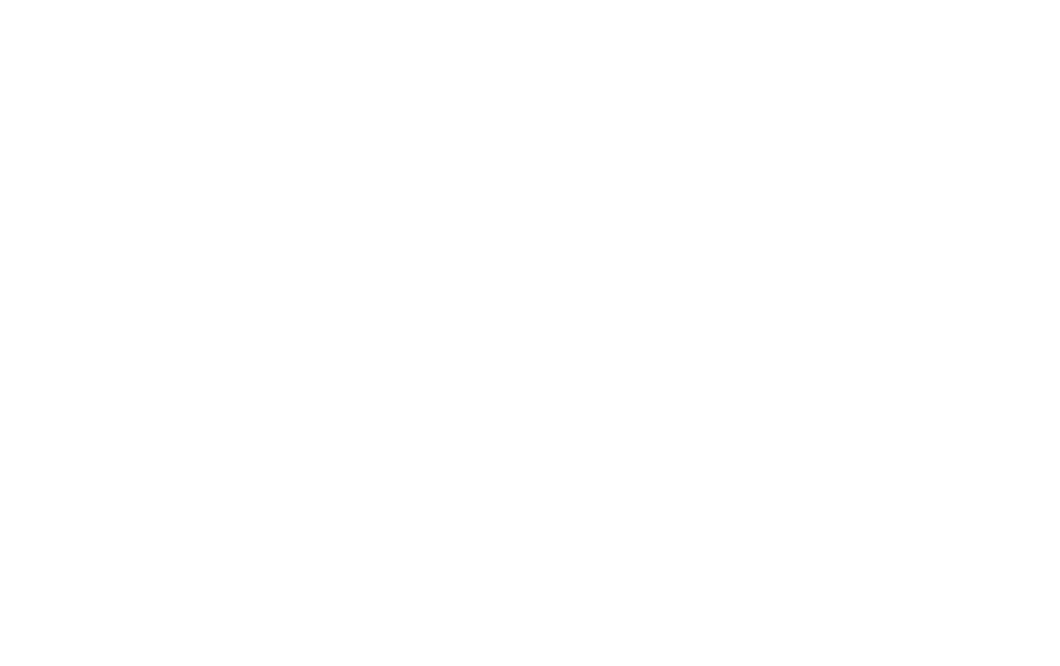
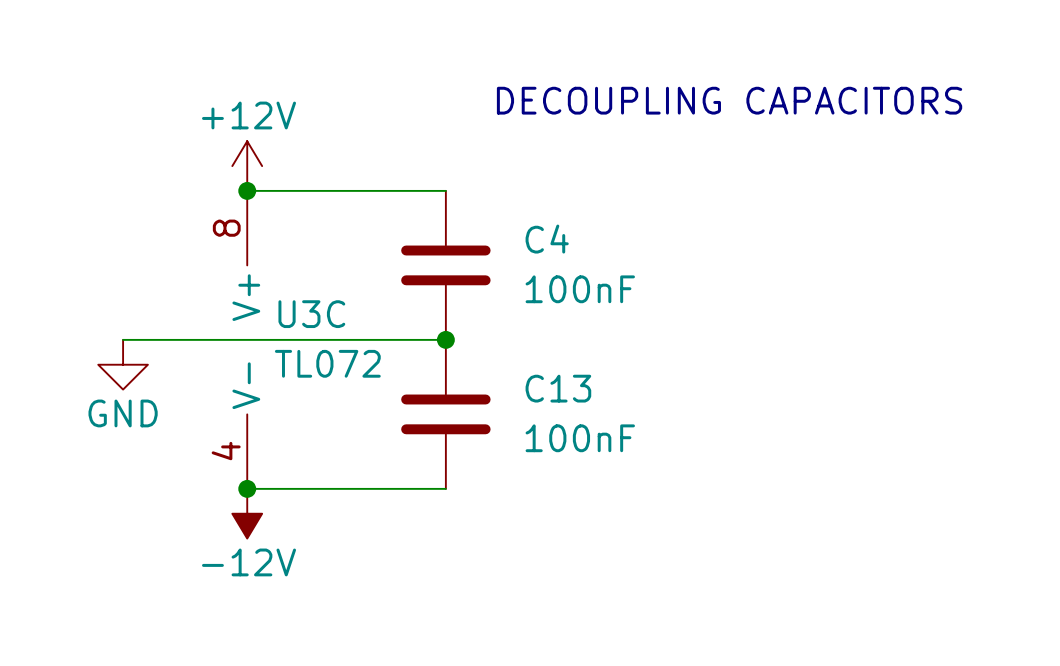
text: none -> DECOUPLING CAPACITORS (729, 100)
power symbol: none -> +12V (247, 166)
wire: none -> (247, 190) (445, 190)
junction: none -> (247, 190)
C4: none -> 100nF (445, 265)
wire: none -> (123, 339) (445, 339)
U3C: none -> TL072 (247, 339)
junction: none -> (445, 339)
power symbol: none -> GND (123, 364)
C13: none -> 100nF (445, 414)
wire: none -> (247, 488) (445, 488)
junction: none -> (247, 488)
power symbol: none -> -12V (247, 513)

